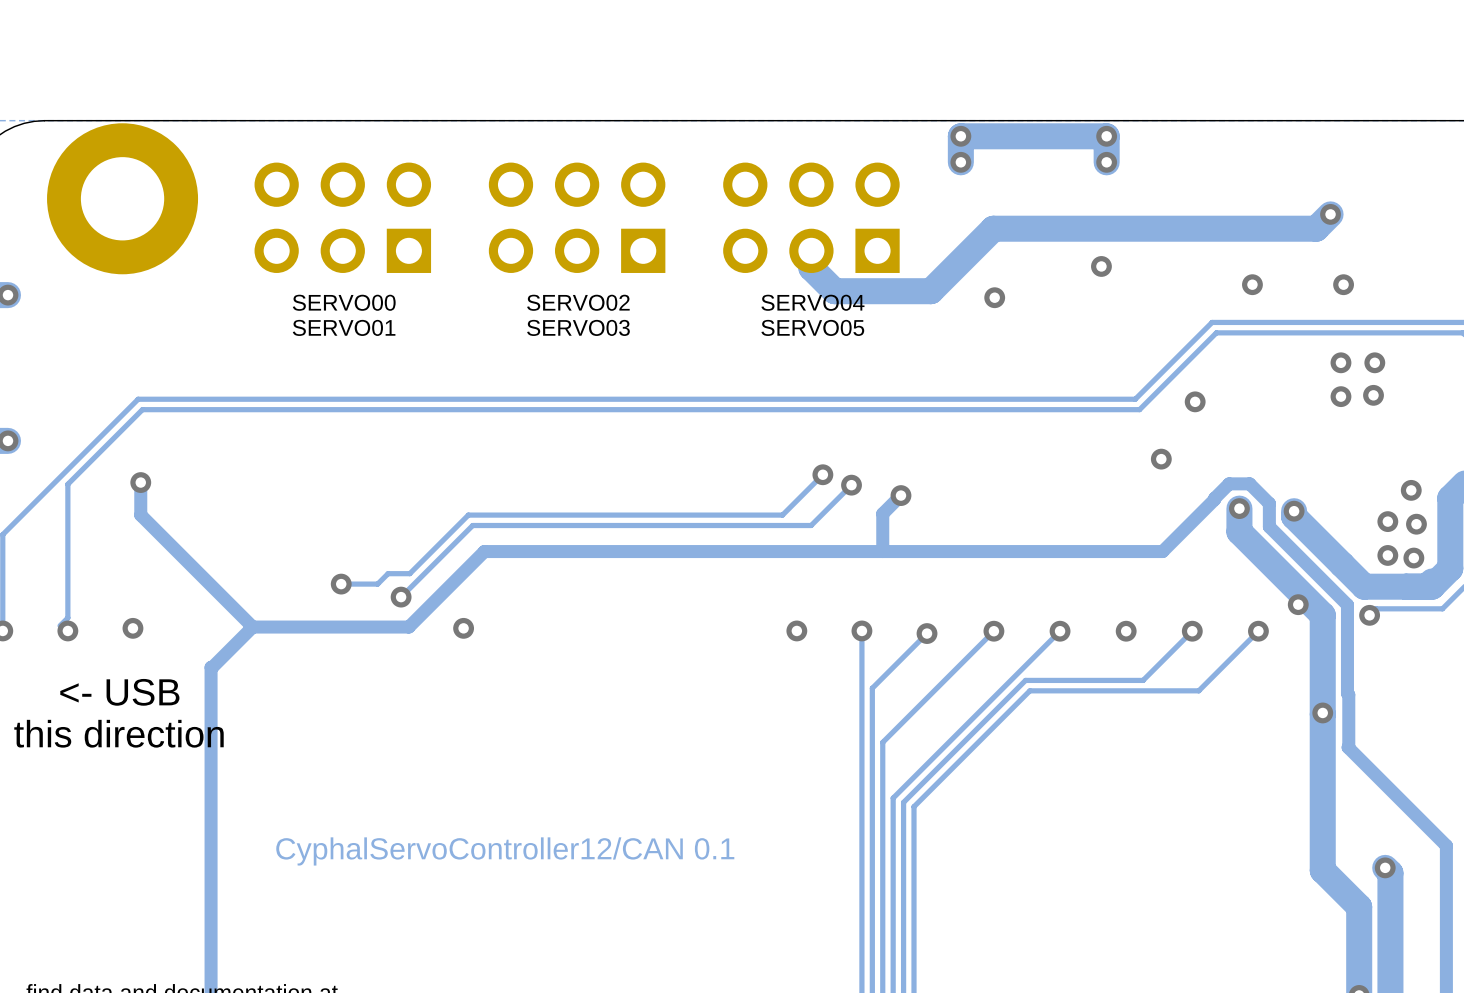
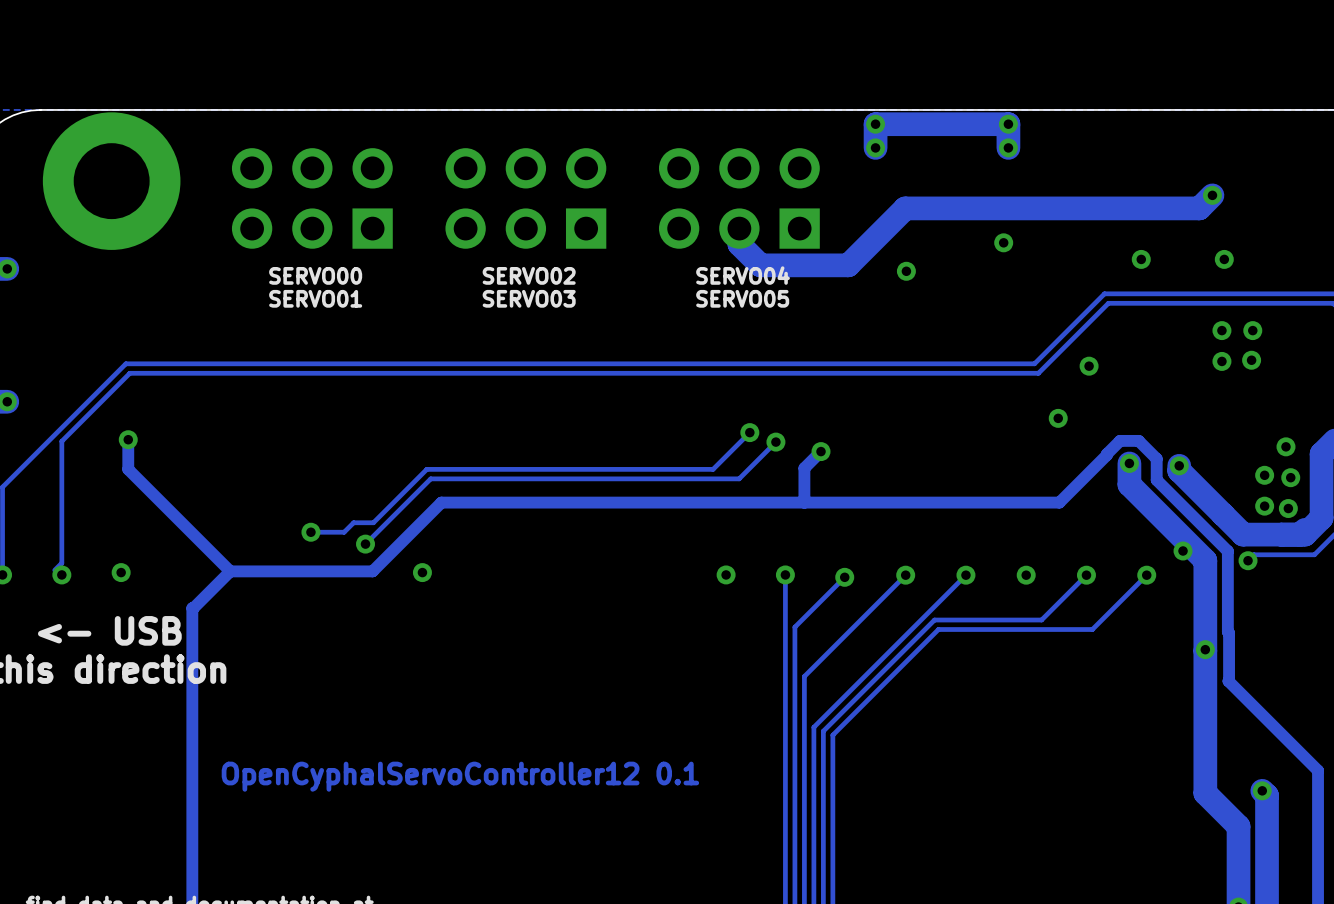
text: CyphalServoController12/CAN 0.1 (505, 851) -> OpenCyphalServoController12 0.1 (460, 776)

